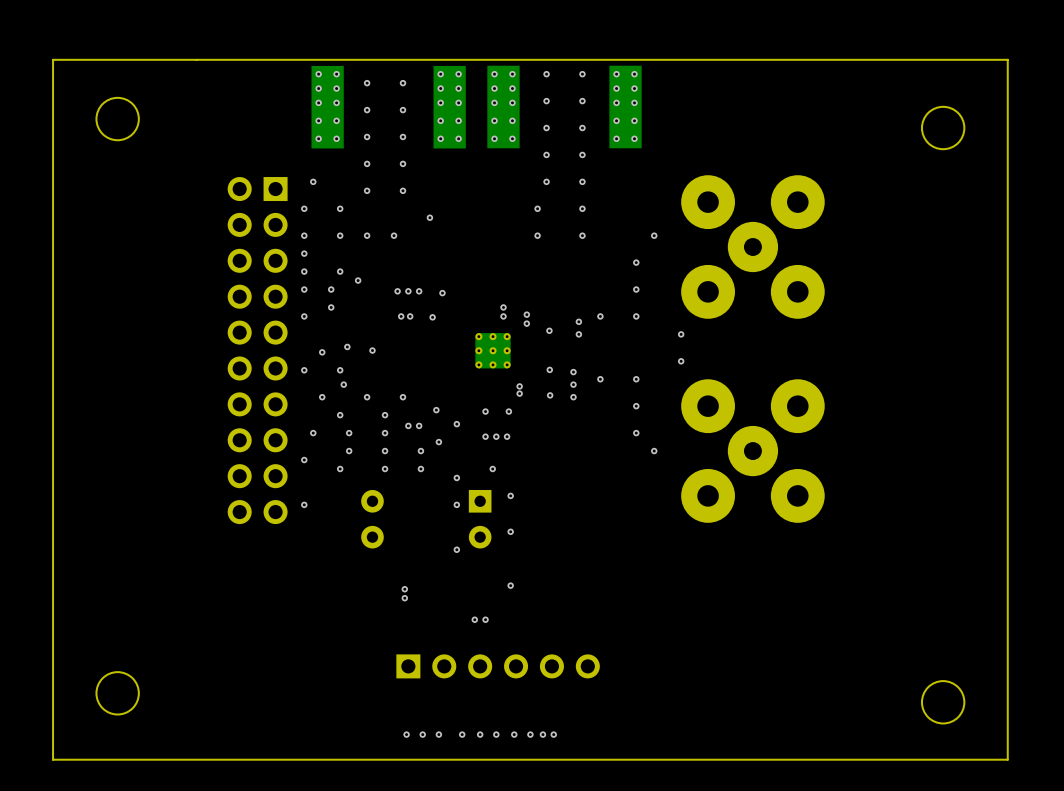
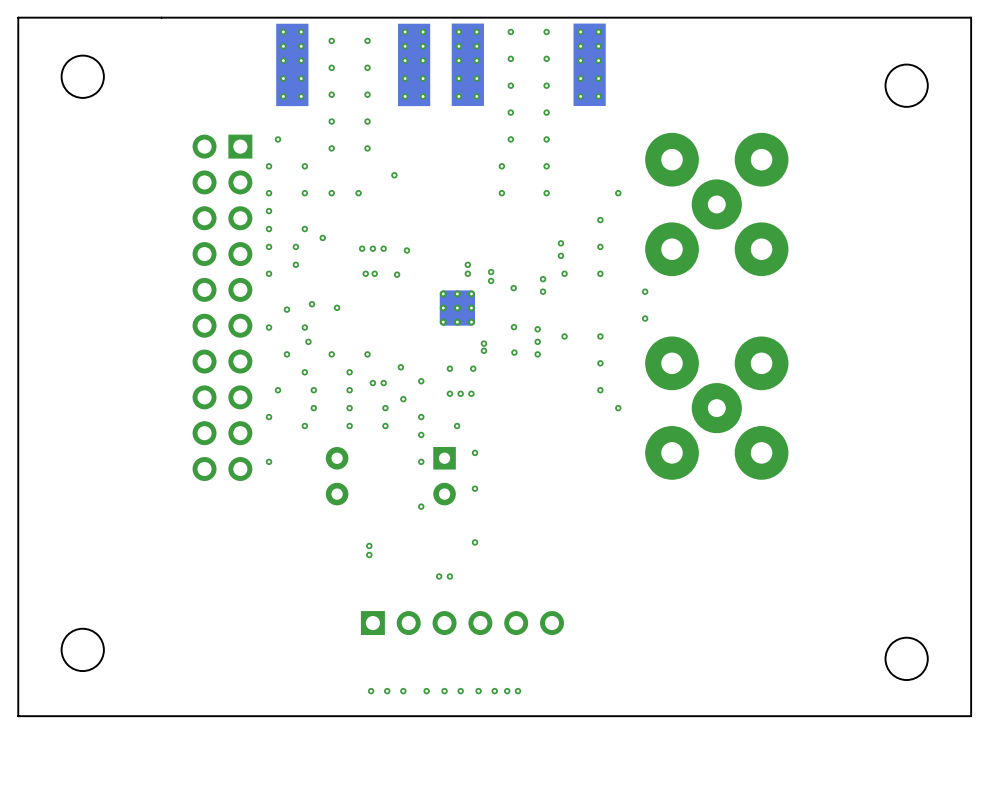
via: none -> (560, 243)
via: none -> (560, 255)
via: none -> (421, 417)

